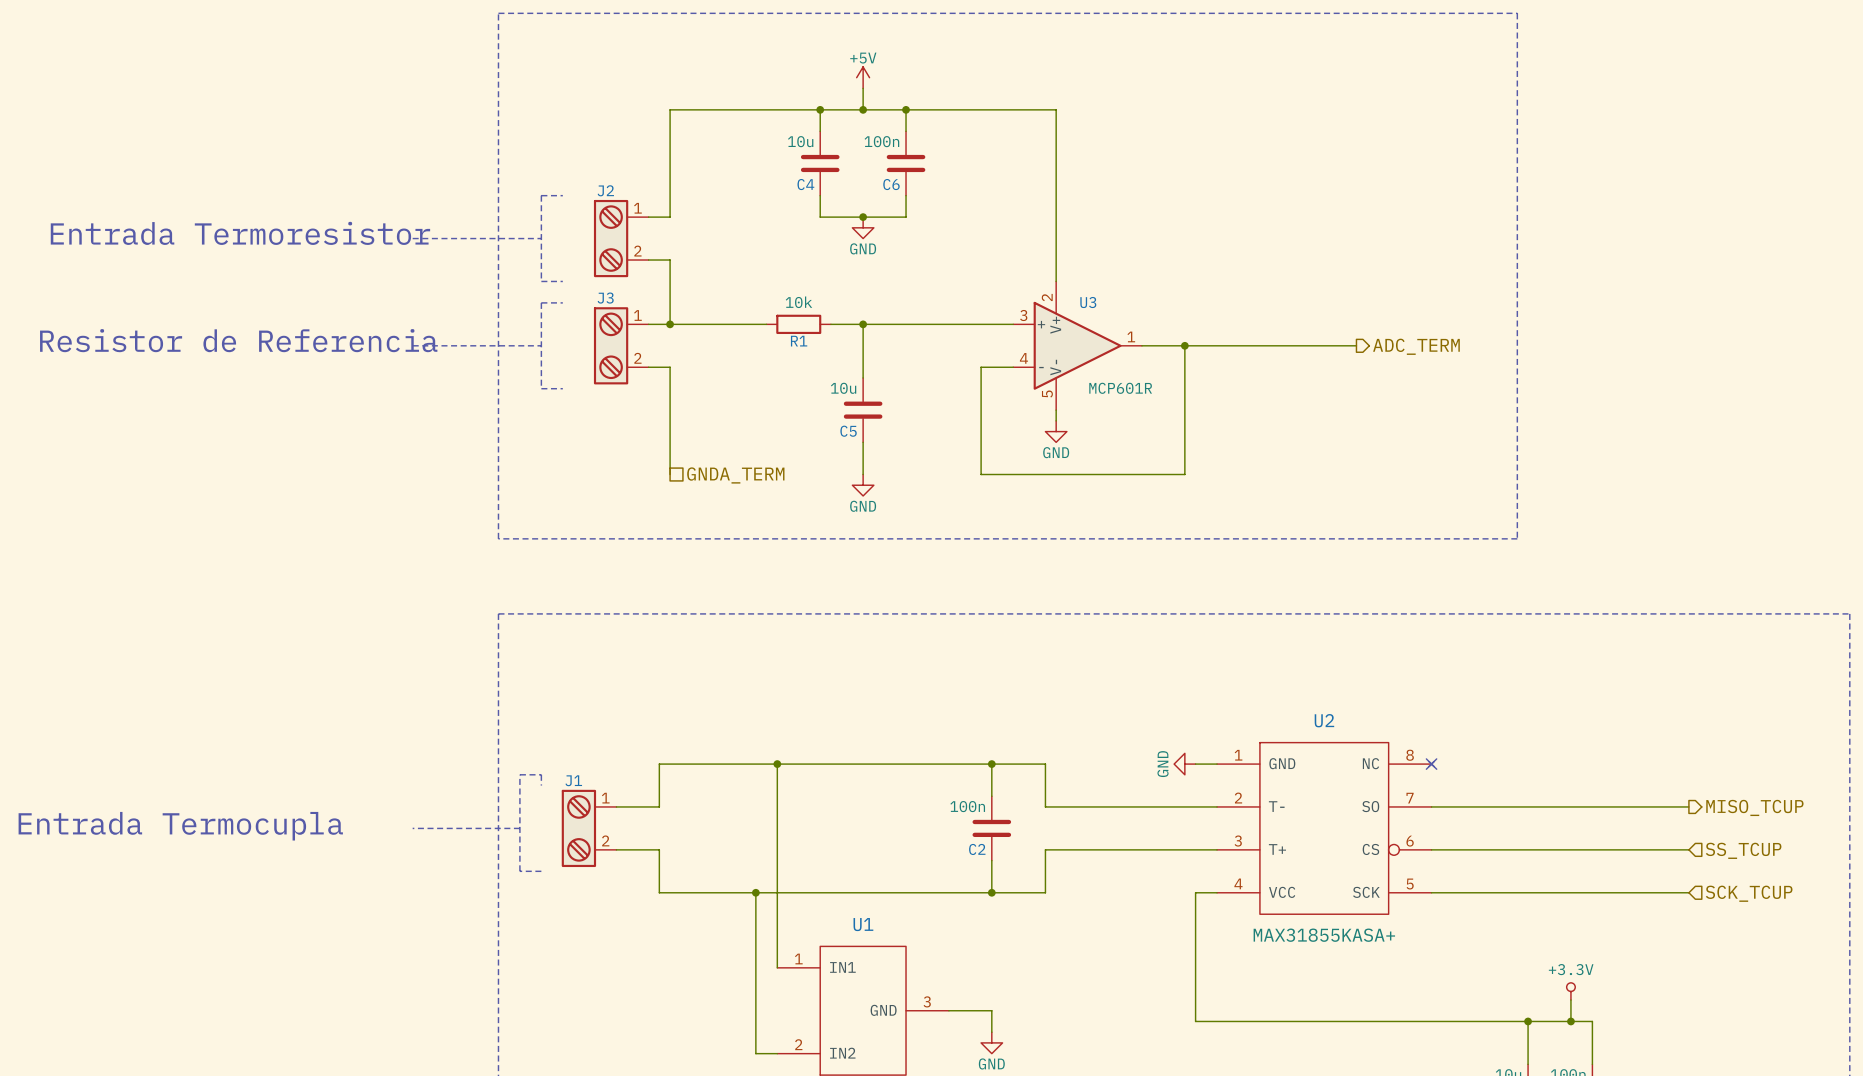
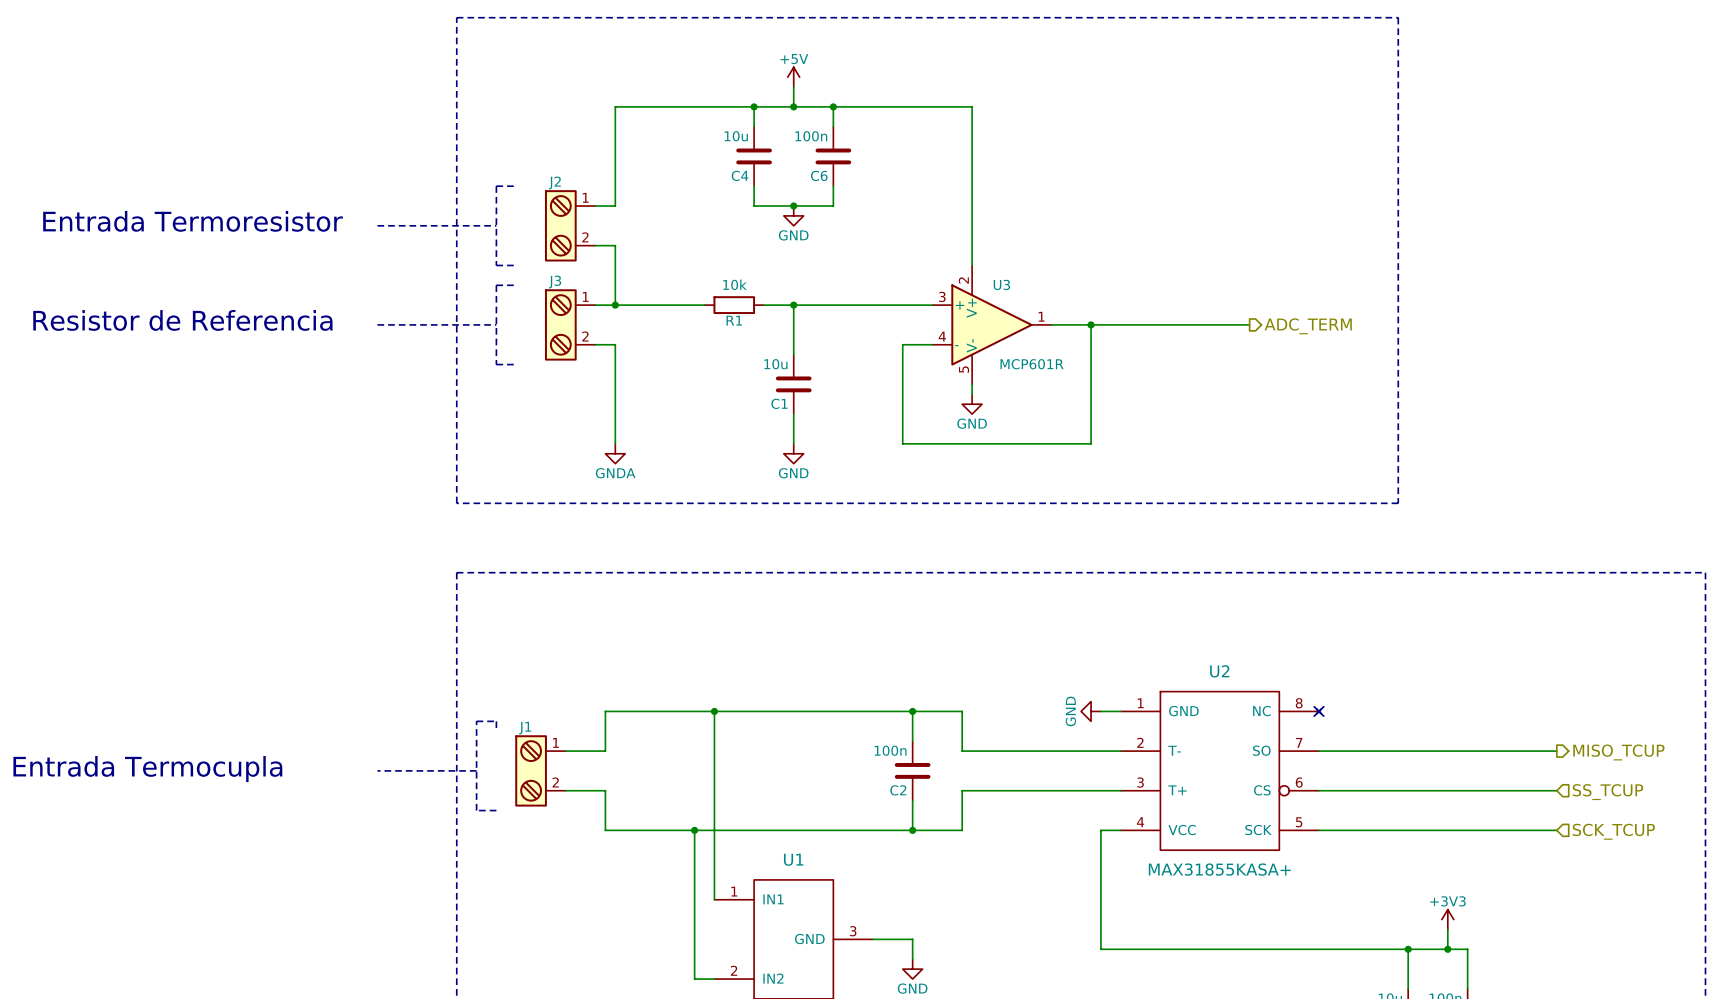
C5 name: C5 (848, 431) -> C1 (779, 403)
hierarchical label: GNDA_TERM (735, 475) -> none
power symbol: none -> GNDA (615, 453)
power symbol: +3.3V (1570, 991) -> +3V3 (1447, 919)

